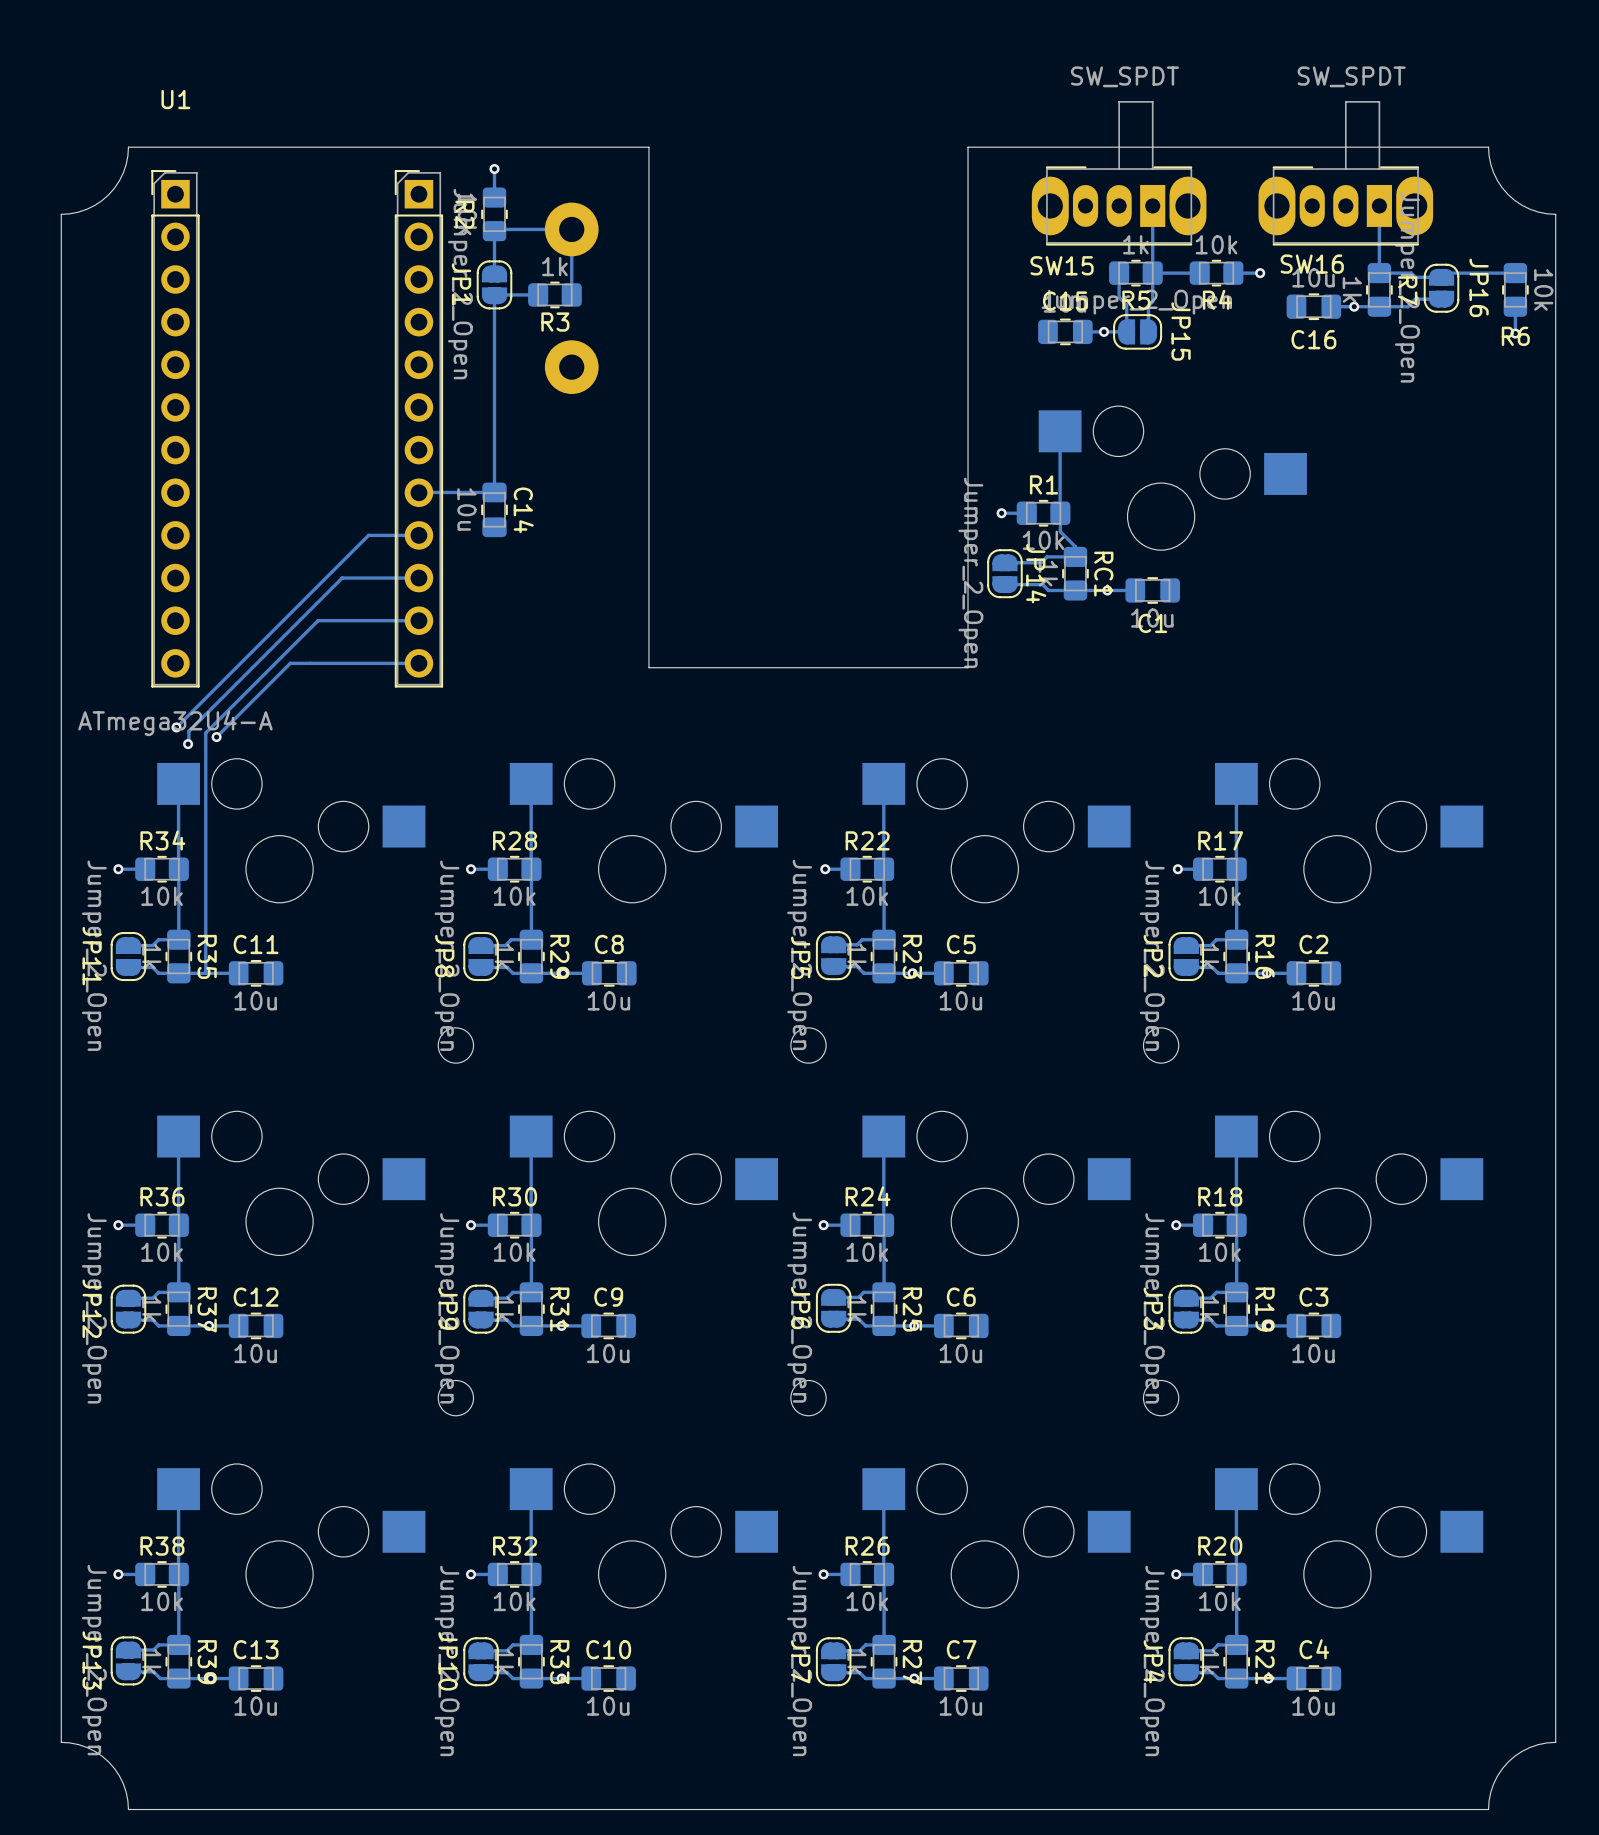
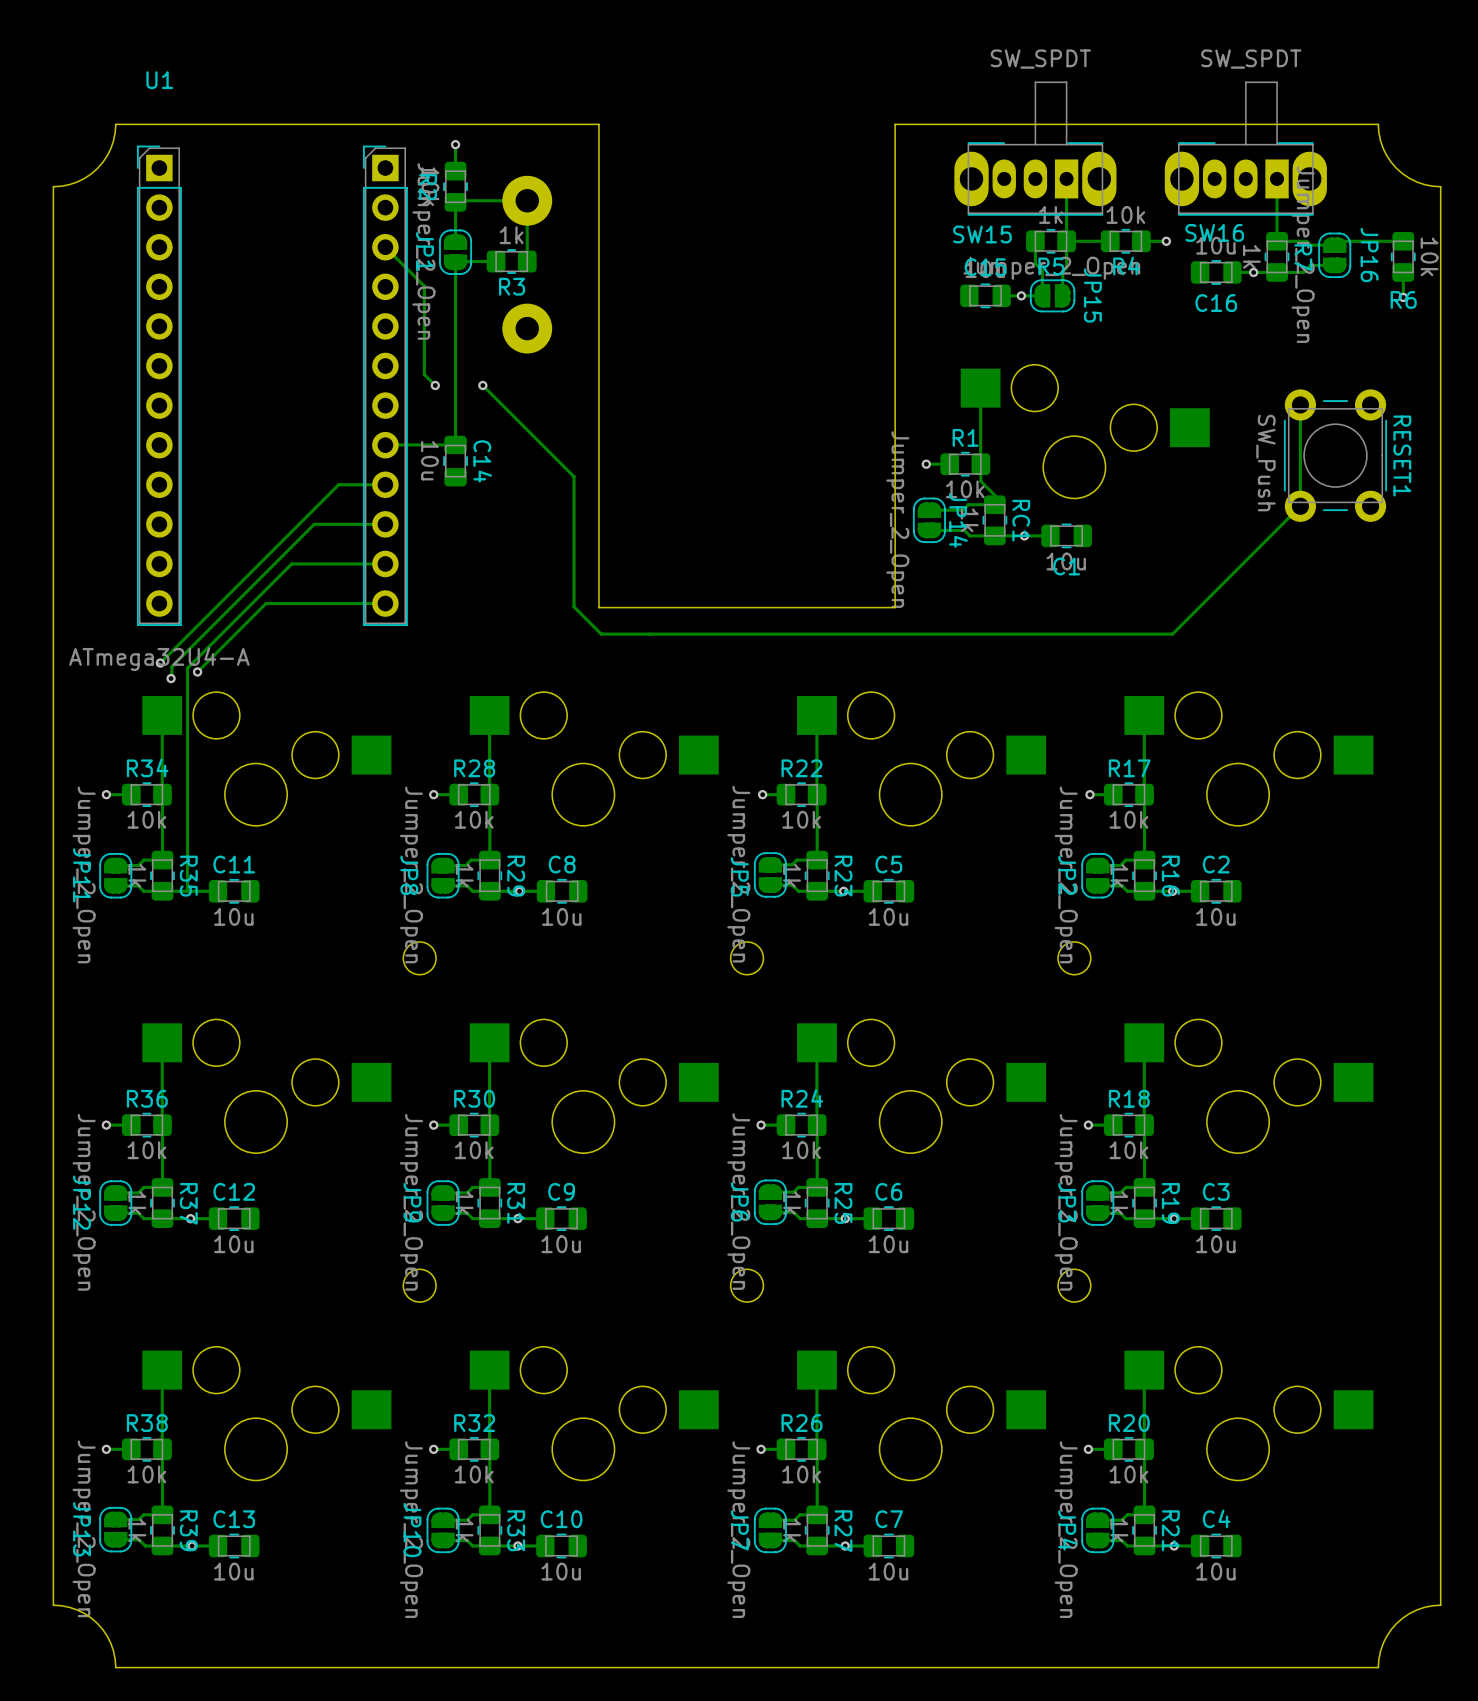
track: none -> (385, 247) (424, 286) (424, 374) (435, 385)
via: none -> (435, 385)
track: none -> (482, 385) (574, 476) (574, 606) (601, 634) (1172, 634) (1300, 506) (1300, 404)
via: none -> (482, 385)
RESET1: none -> SW_Push (1335, 455)

